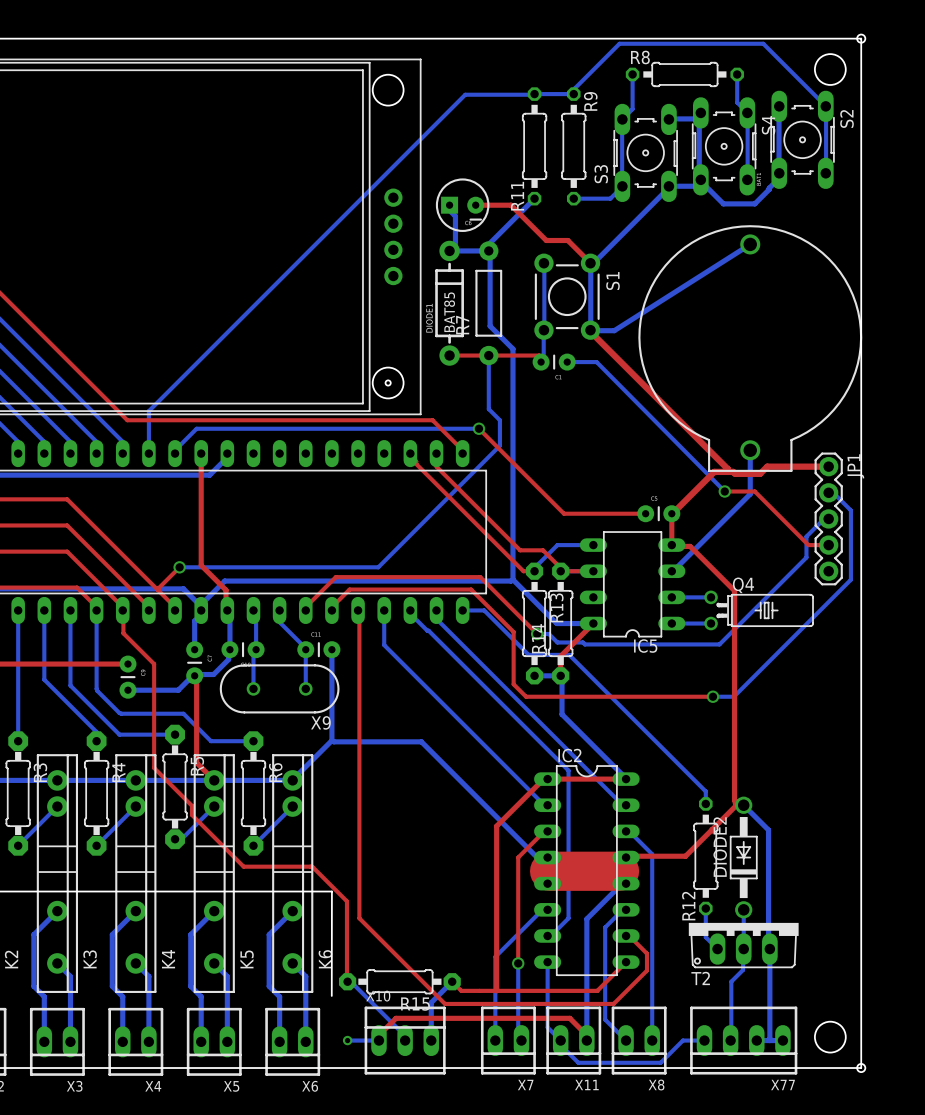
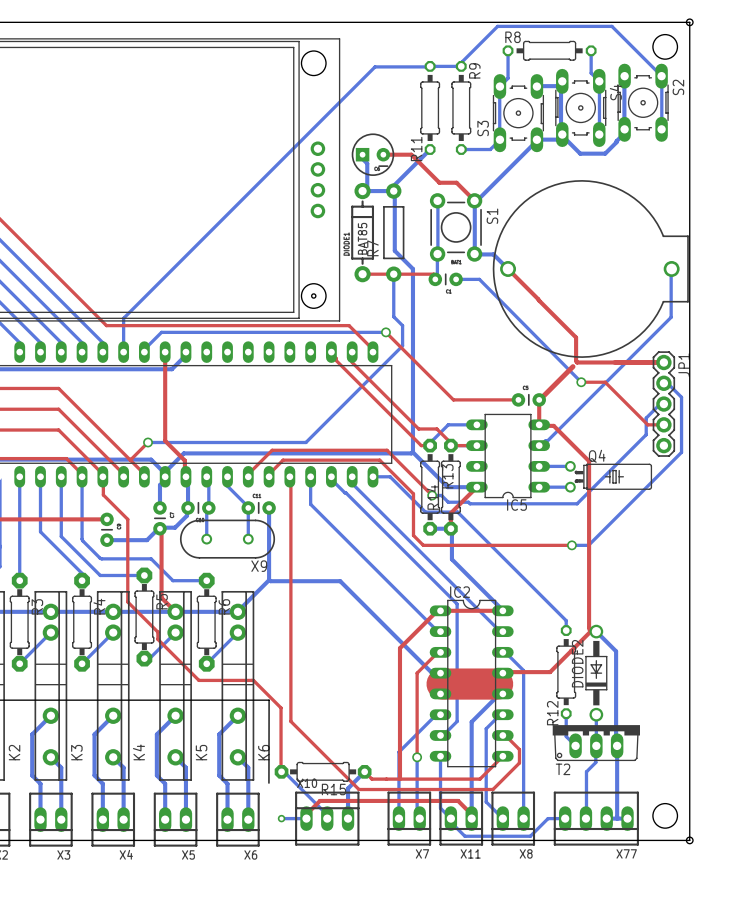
bottom track: (750, 244) (614, 330) -> (508, 268) (493, 254)
top track: (590, 330) (728, 469) (728, 471) -> none
part rotation: 0° (750, 348) -> 90° counterclockwise (590, 268)
bottom track: (750, 450) (750, 494) (673, 571) -> (671, 268) (671, 317) (547, 440) (540, 445)
top track: (767, 466) (760, 473) (714, 471) -> (615, 362) (577, 362) (576, 337) (508, 268)

